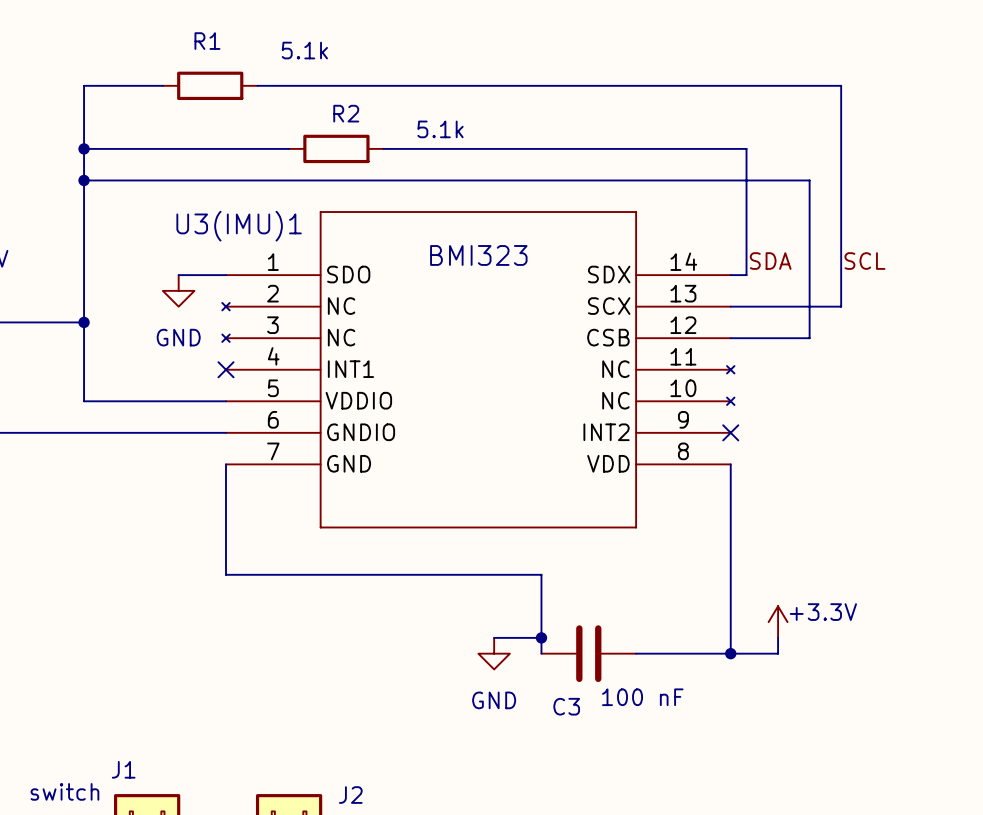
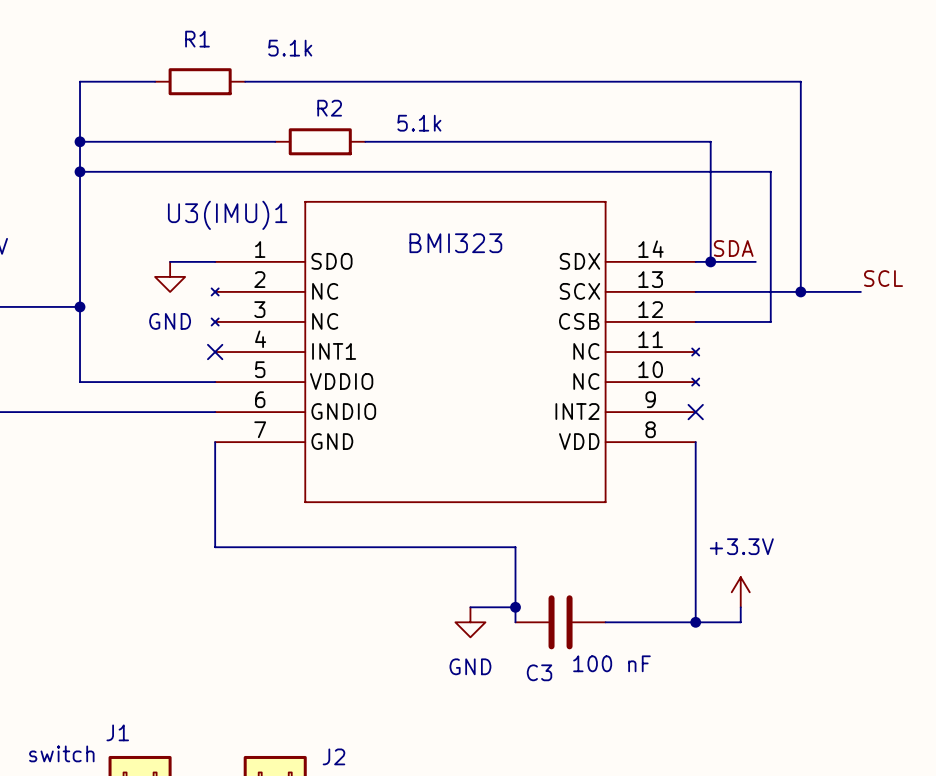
label position: SCL (864, 261) -> SCL (883, 278)
wire: none -> (710, 261) (755, 261)
junction: none -> (710, 261)
wire: none -> (800, 291) (860, 291)
junction: none -> (800, 291)
power symbol text position: +3.3V (823, 612) -> +3.3V (741, 546)

